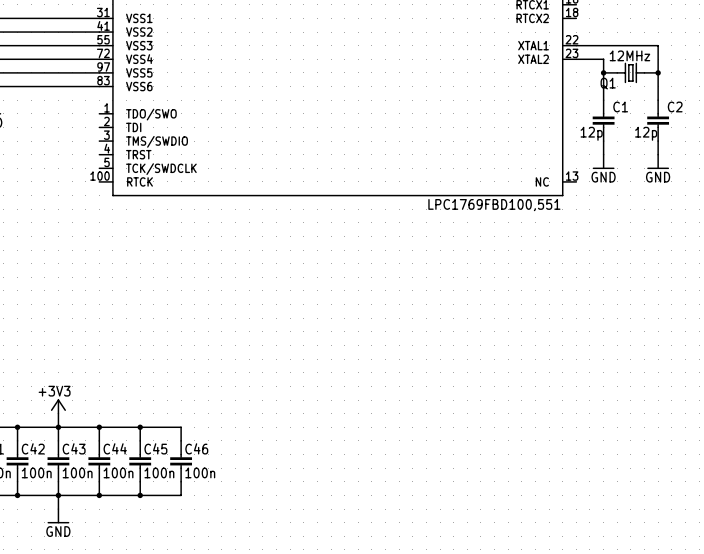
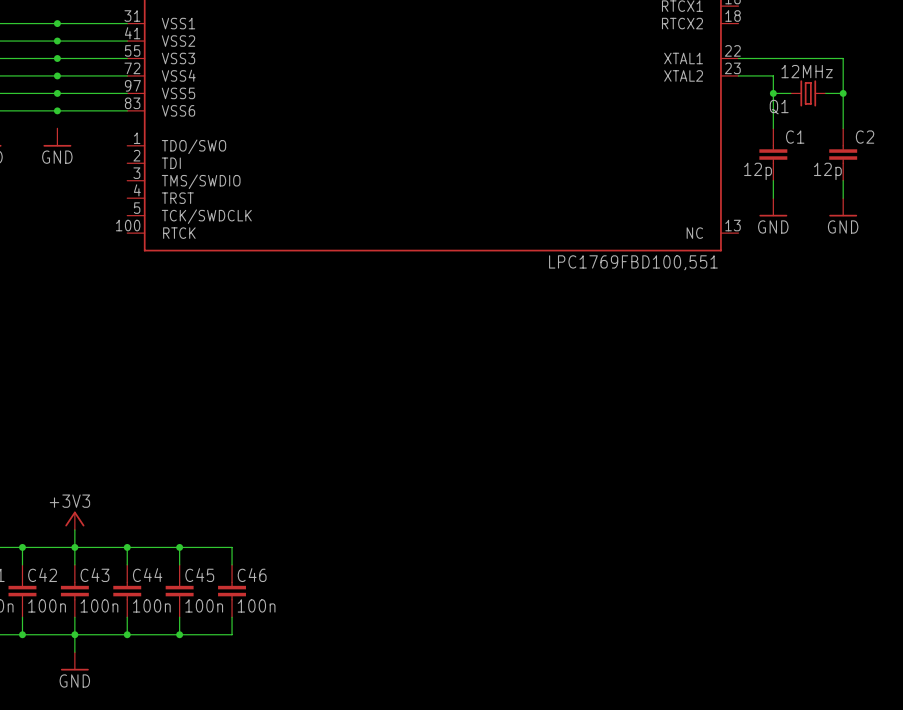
junction: none -> (57, 23)
junction: none -> (57, 41)
junction: none -> (57, 58)
junction: none -> (57, 75)
junction: none -> (57, 93)
junction: none -> (57, 110)
power symbol: none -> GND (57, 137)

